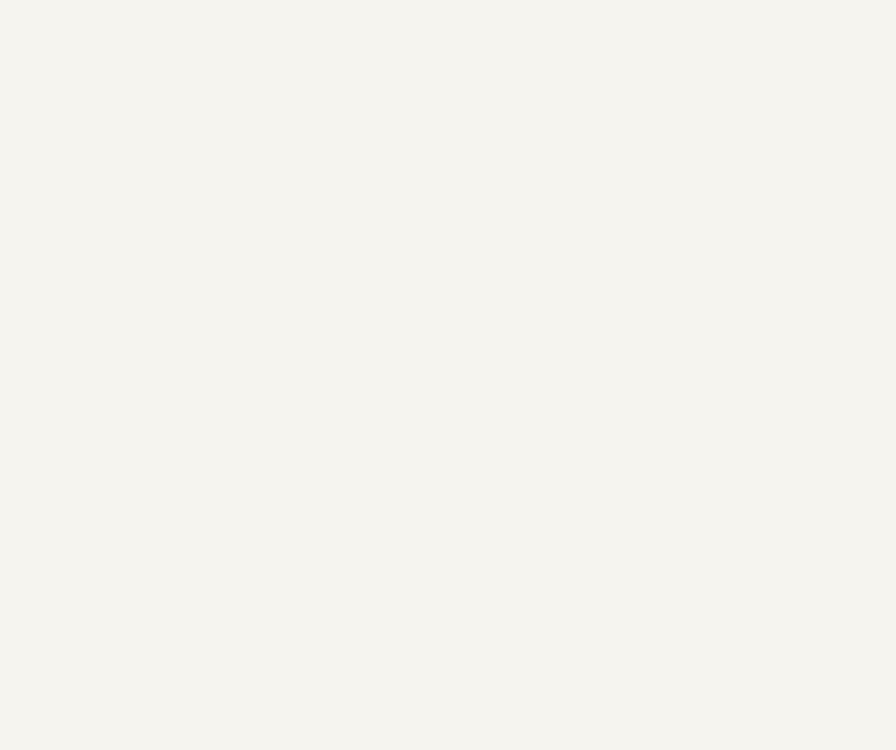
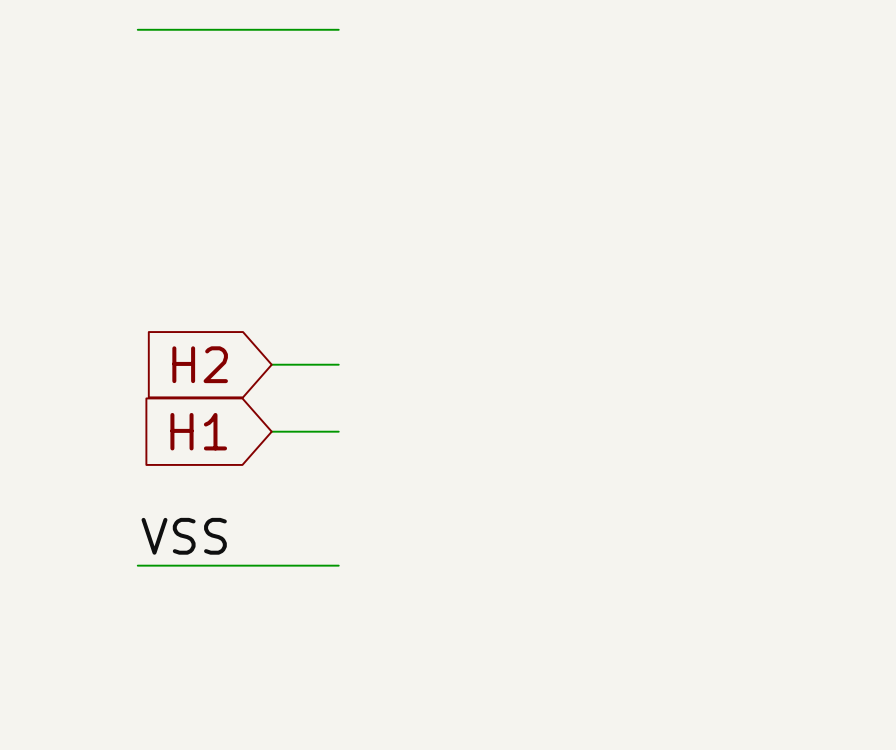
wire: none -> (137, 29) (338, 29)
global label: none -> H2 (200, 364)
wire: none -> (271, 364) (338, 364)
global label: none -> H1 (198, 431)
wire: none -> (271, 431) (338, 431)
label: none -> VSS (184, 536)
wire: none -> (137, 565) (338, 565)

